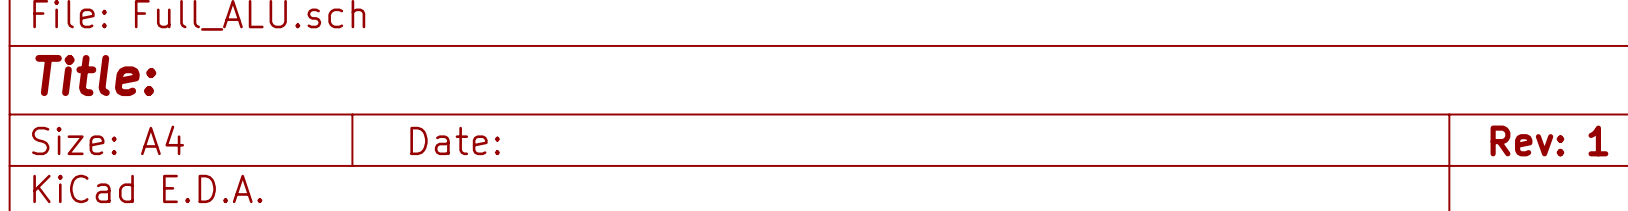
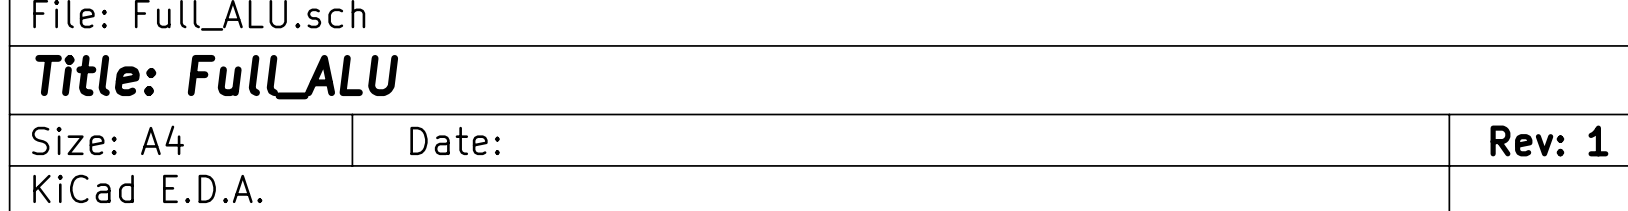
title block: Title: (95, 75) -> Title: Full_ALU (216, 77)

